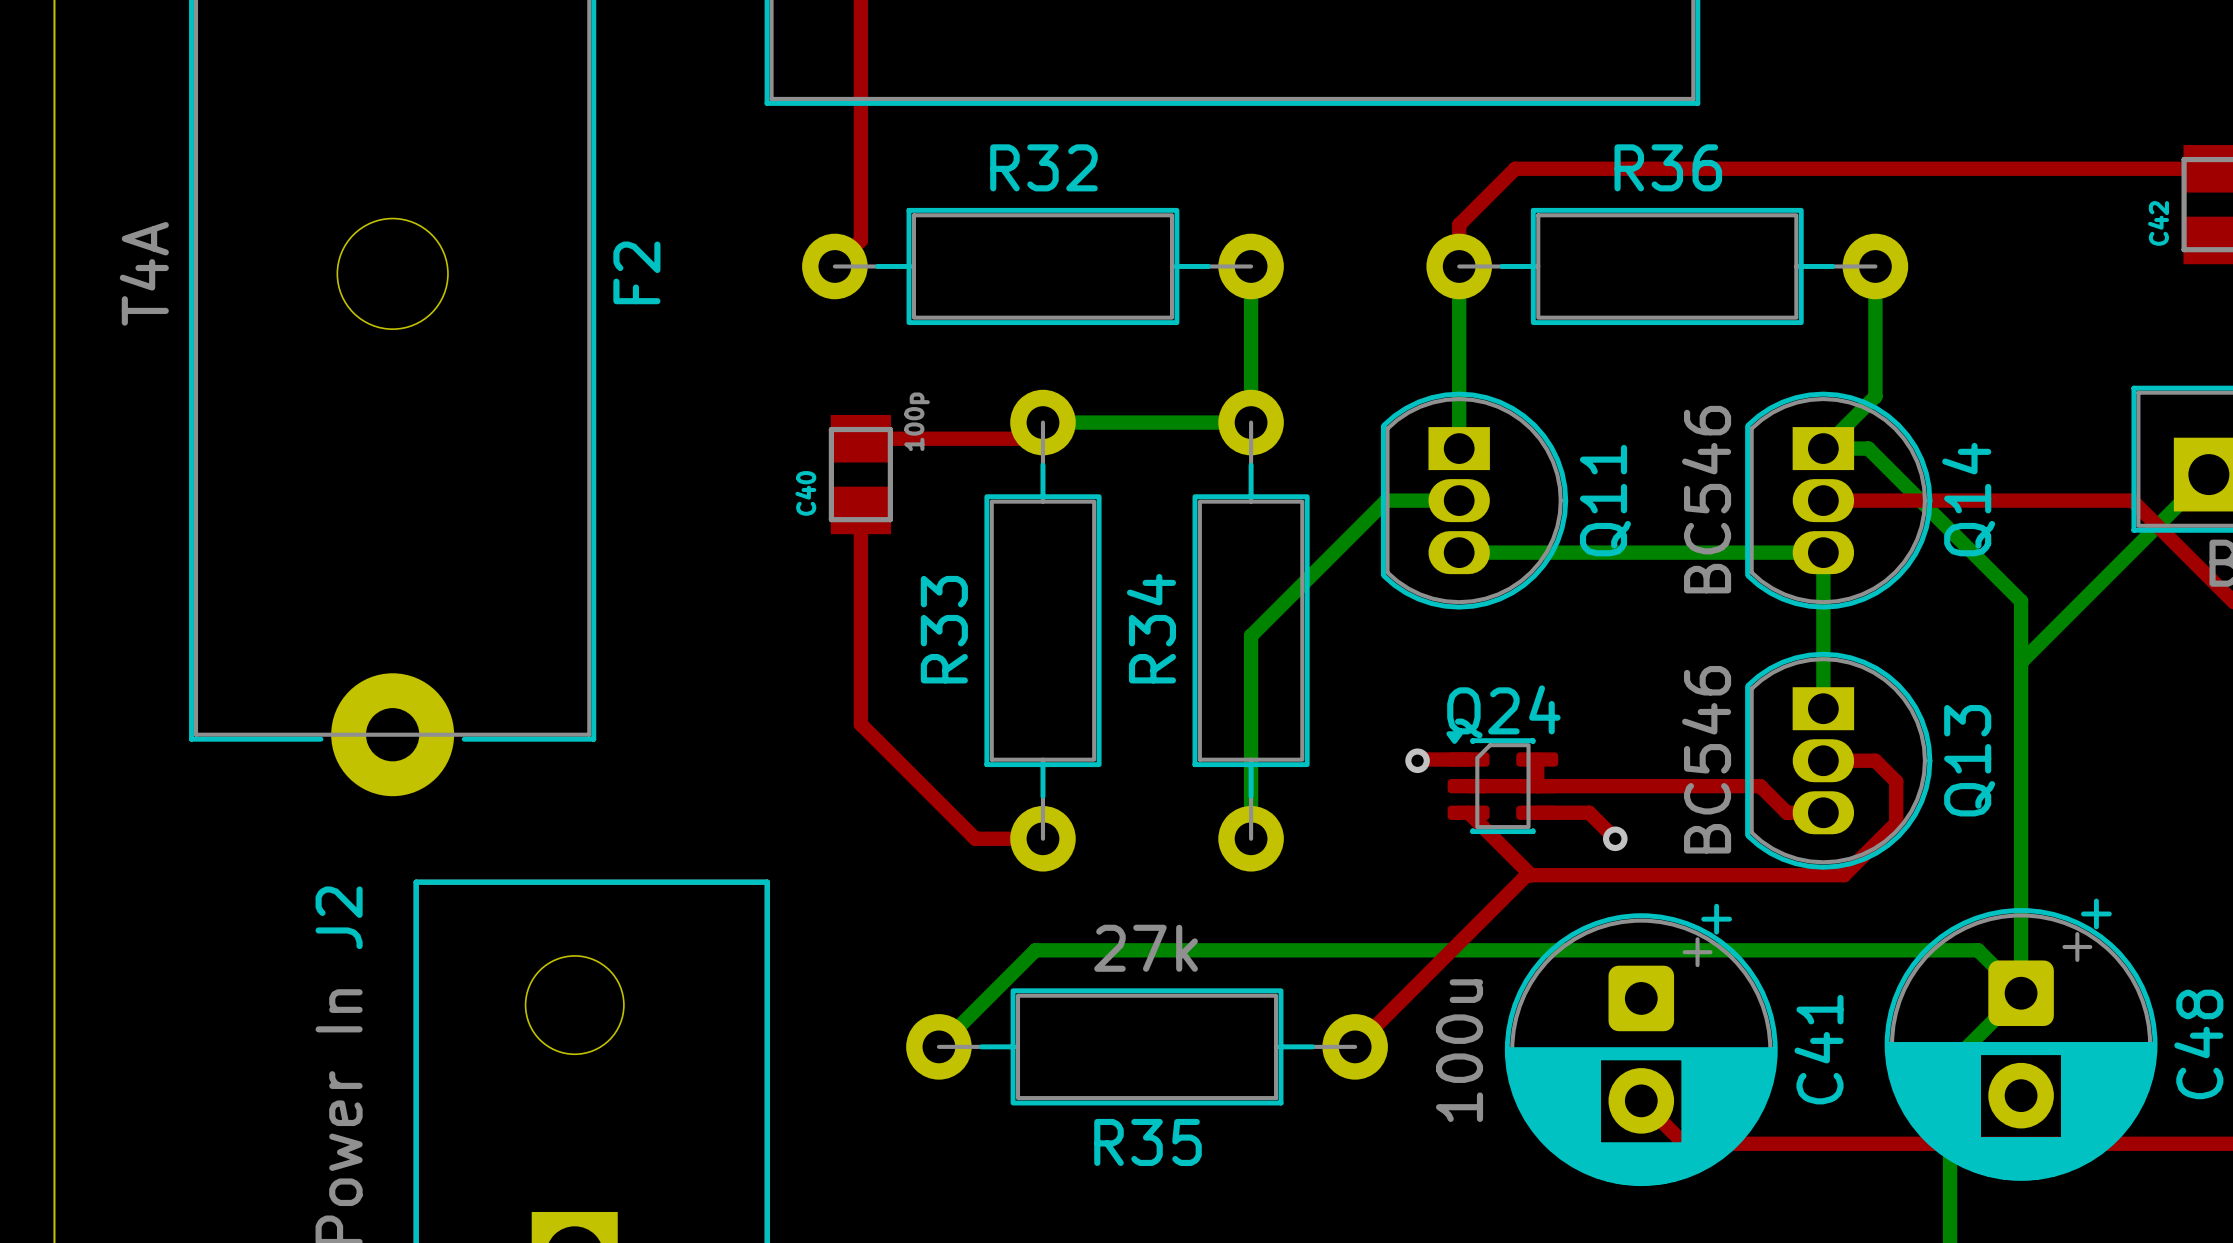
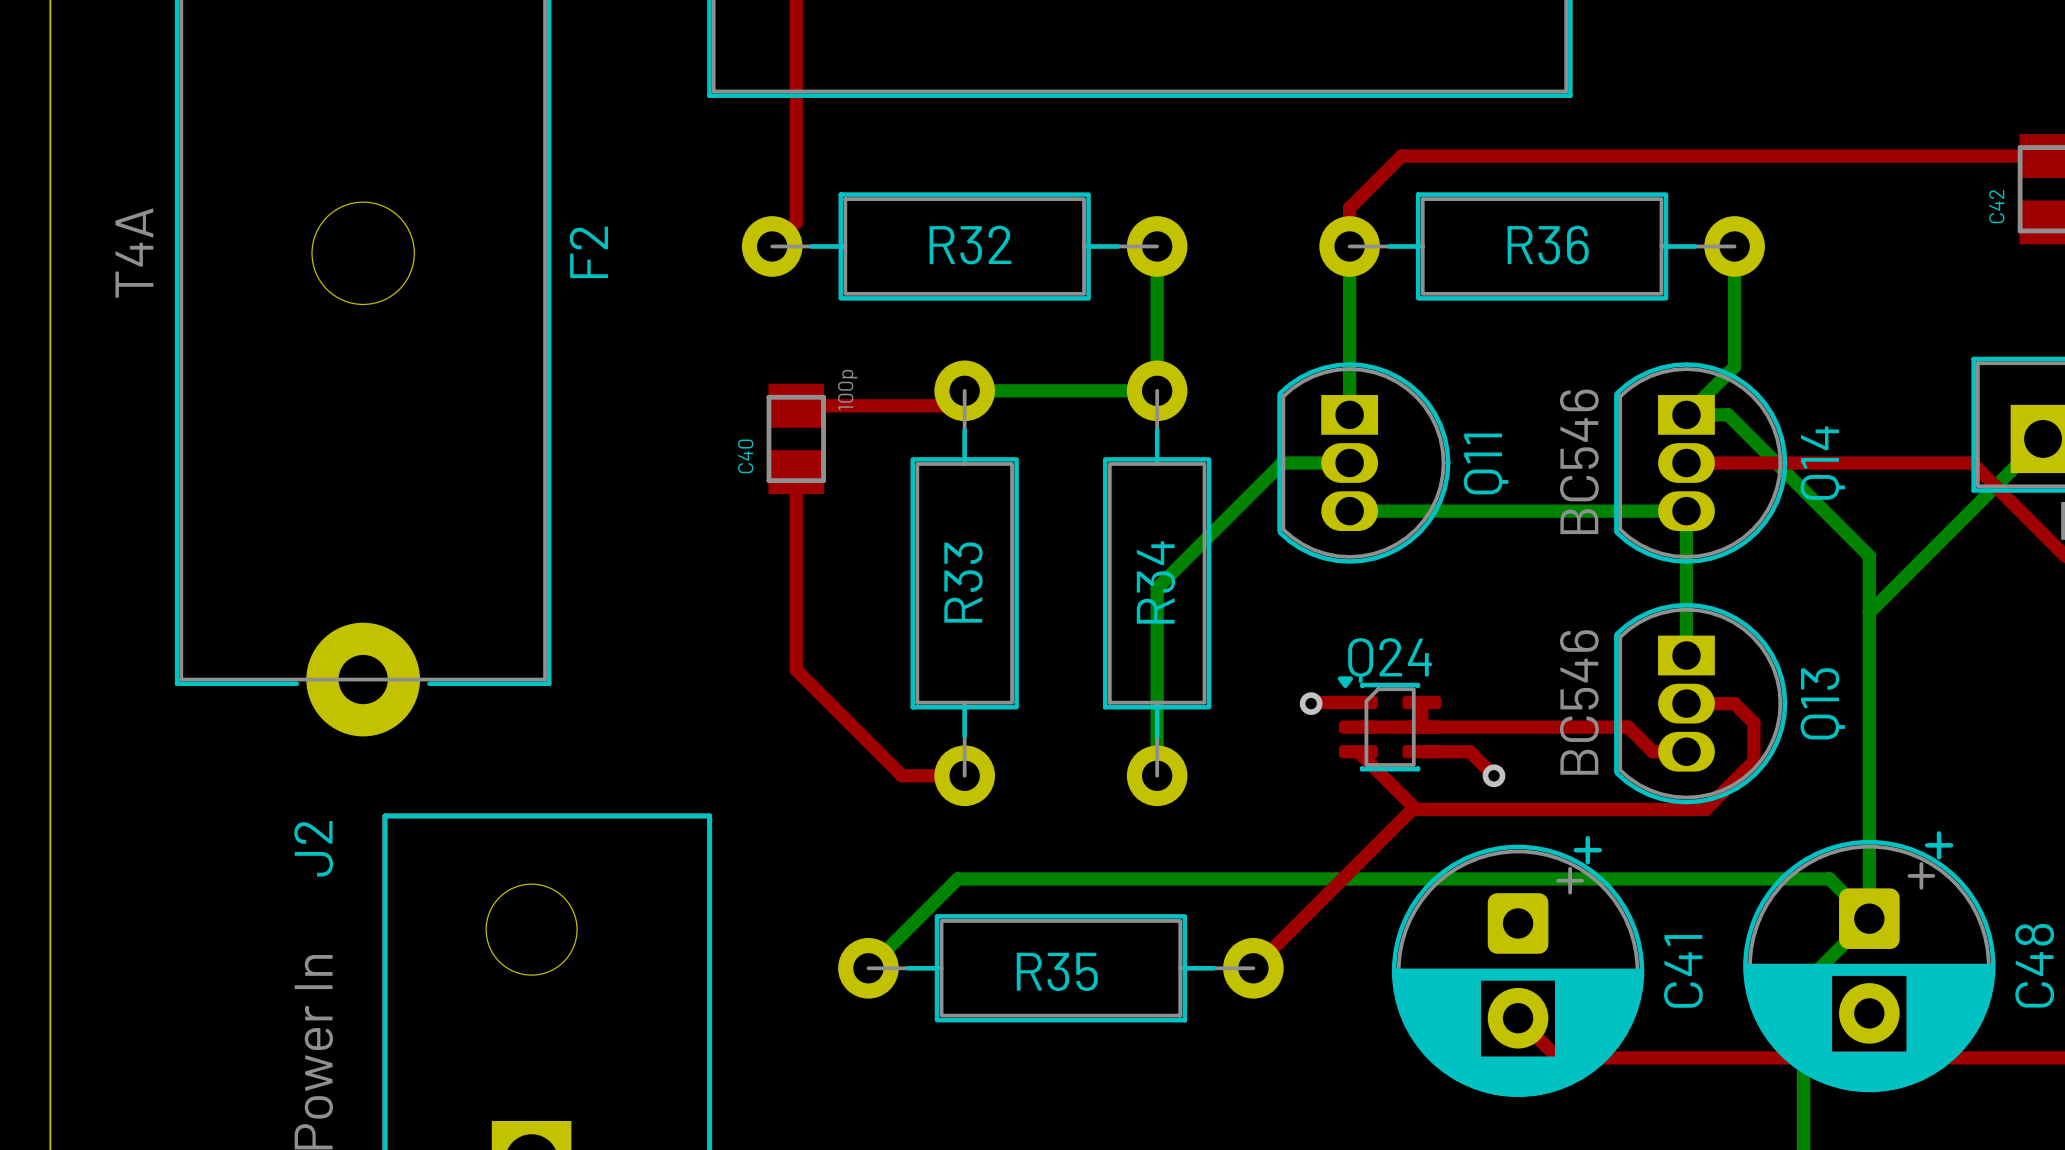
R32 name position: R32 (1043, 167) -> R32 (970, 245)
R36 name position: R36 (1668, 167) -> R36 (1548, 245)
R34 name position: R34 (1151, 628) -> R34 (1155, 582)
R33 name position: R33 (944, 629) -> R33 (963, 582)
R35 value: 27k (1146, 948) -> none
C41 value: 100u (1459, 1050) -> none
R35 name position: R35 (1148, 1142) -> R35 (1057, 971)

